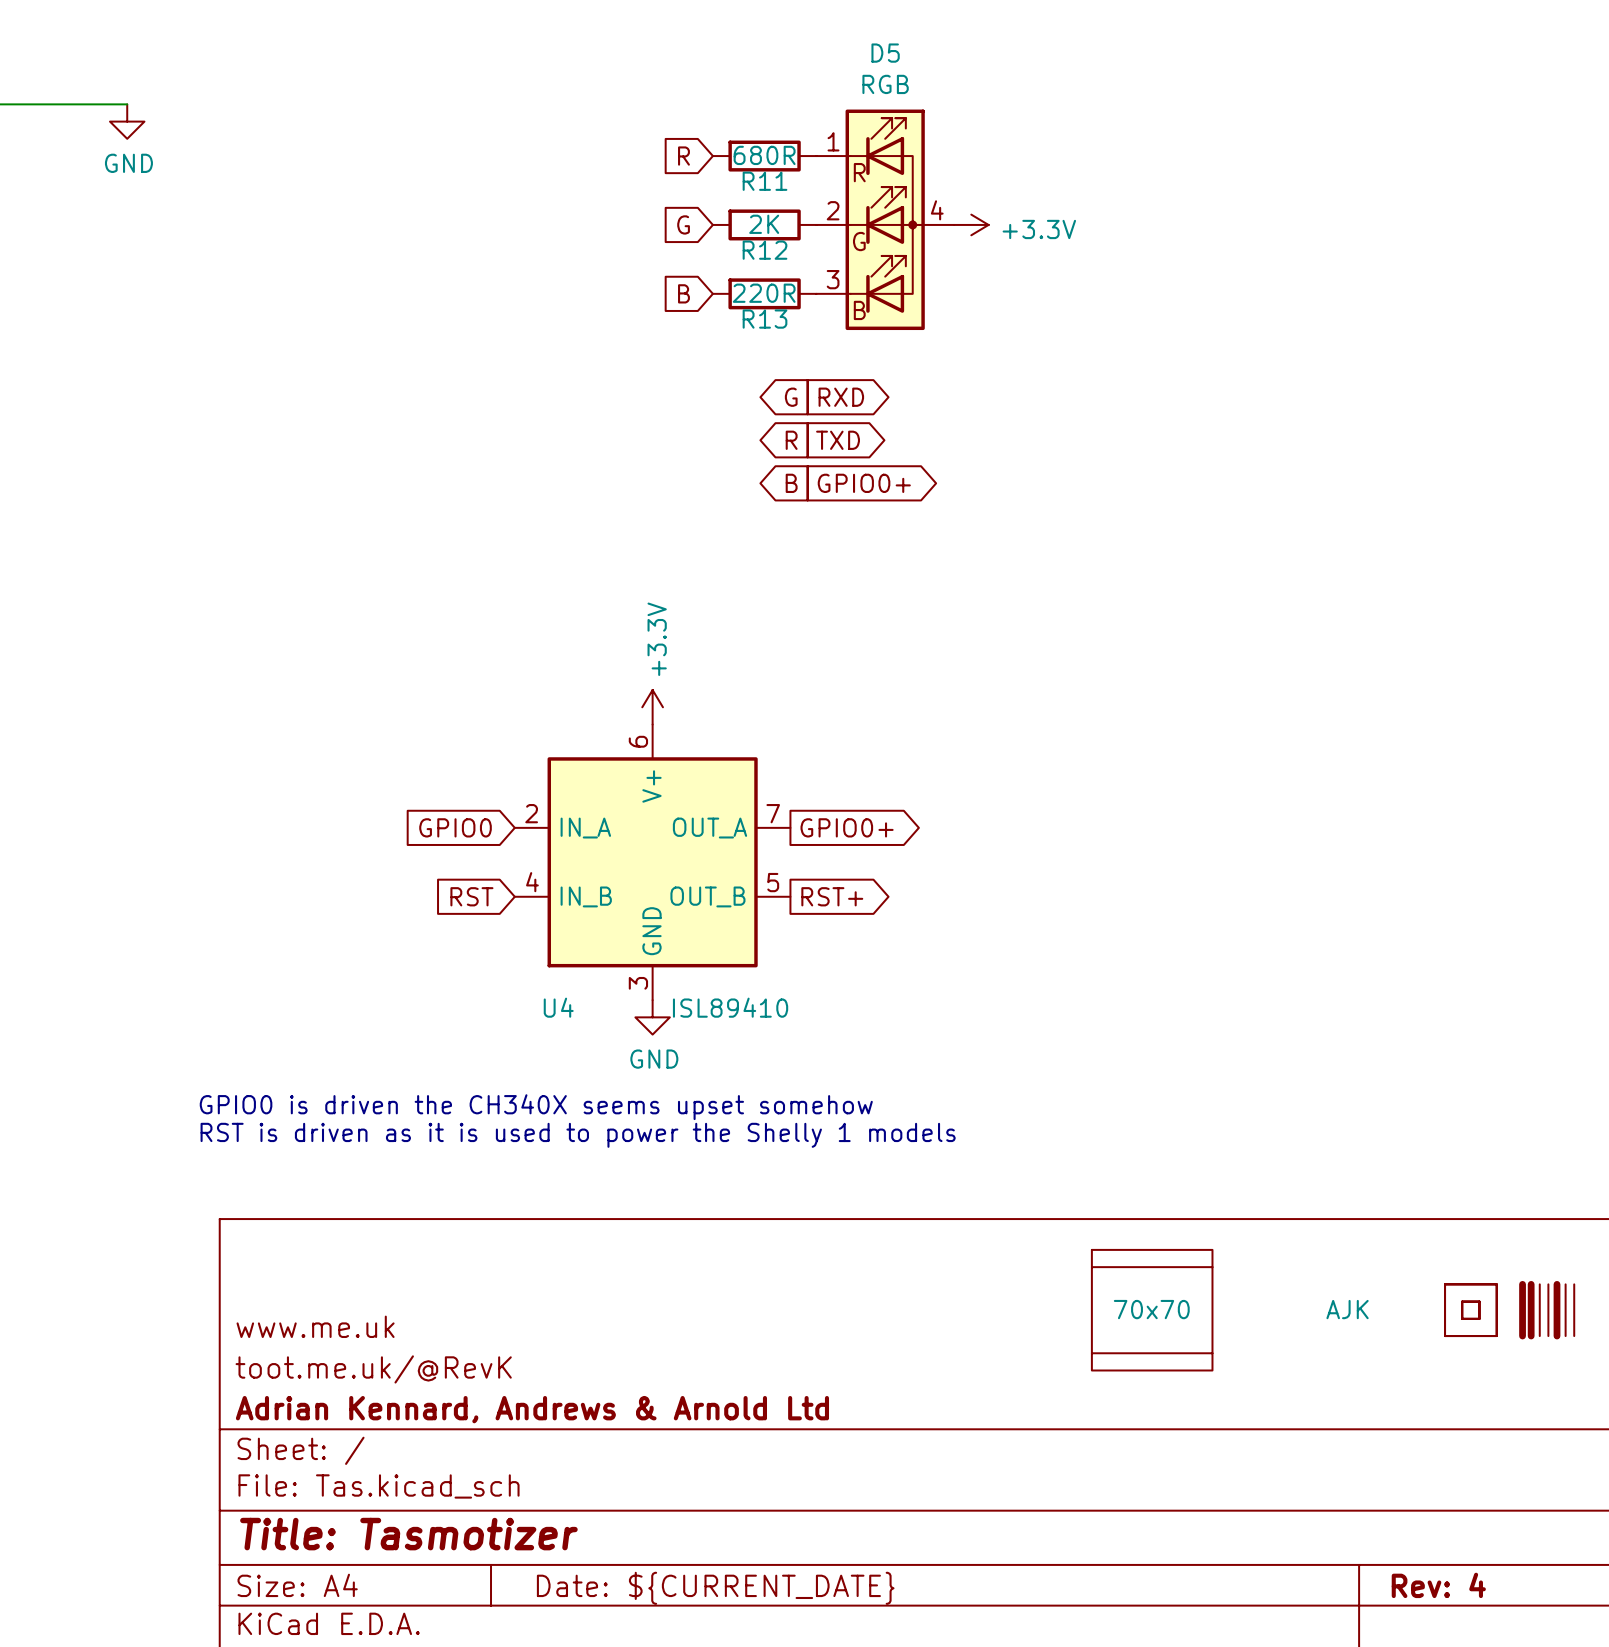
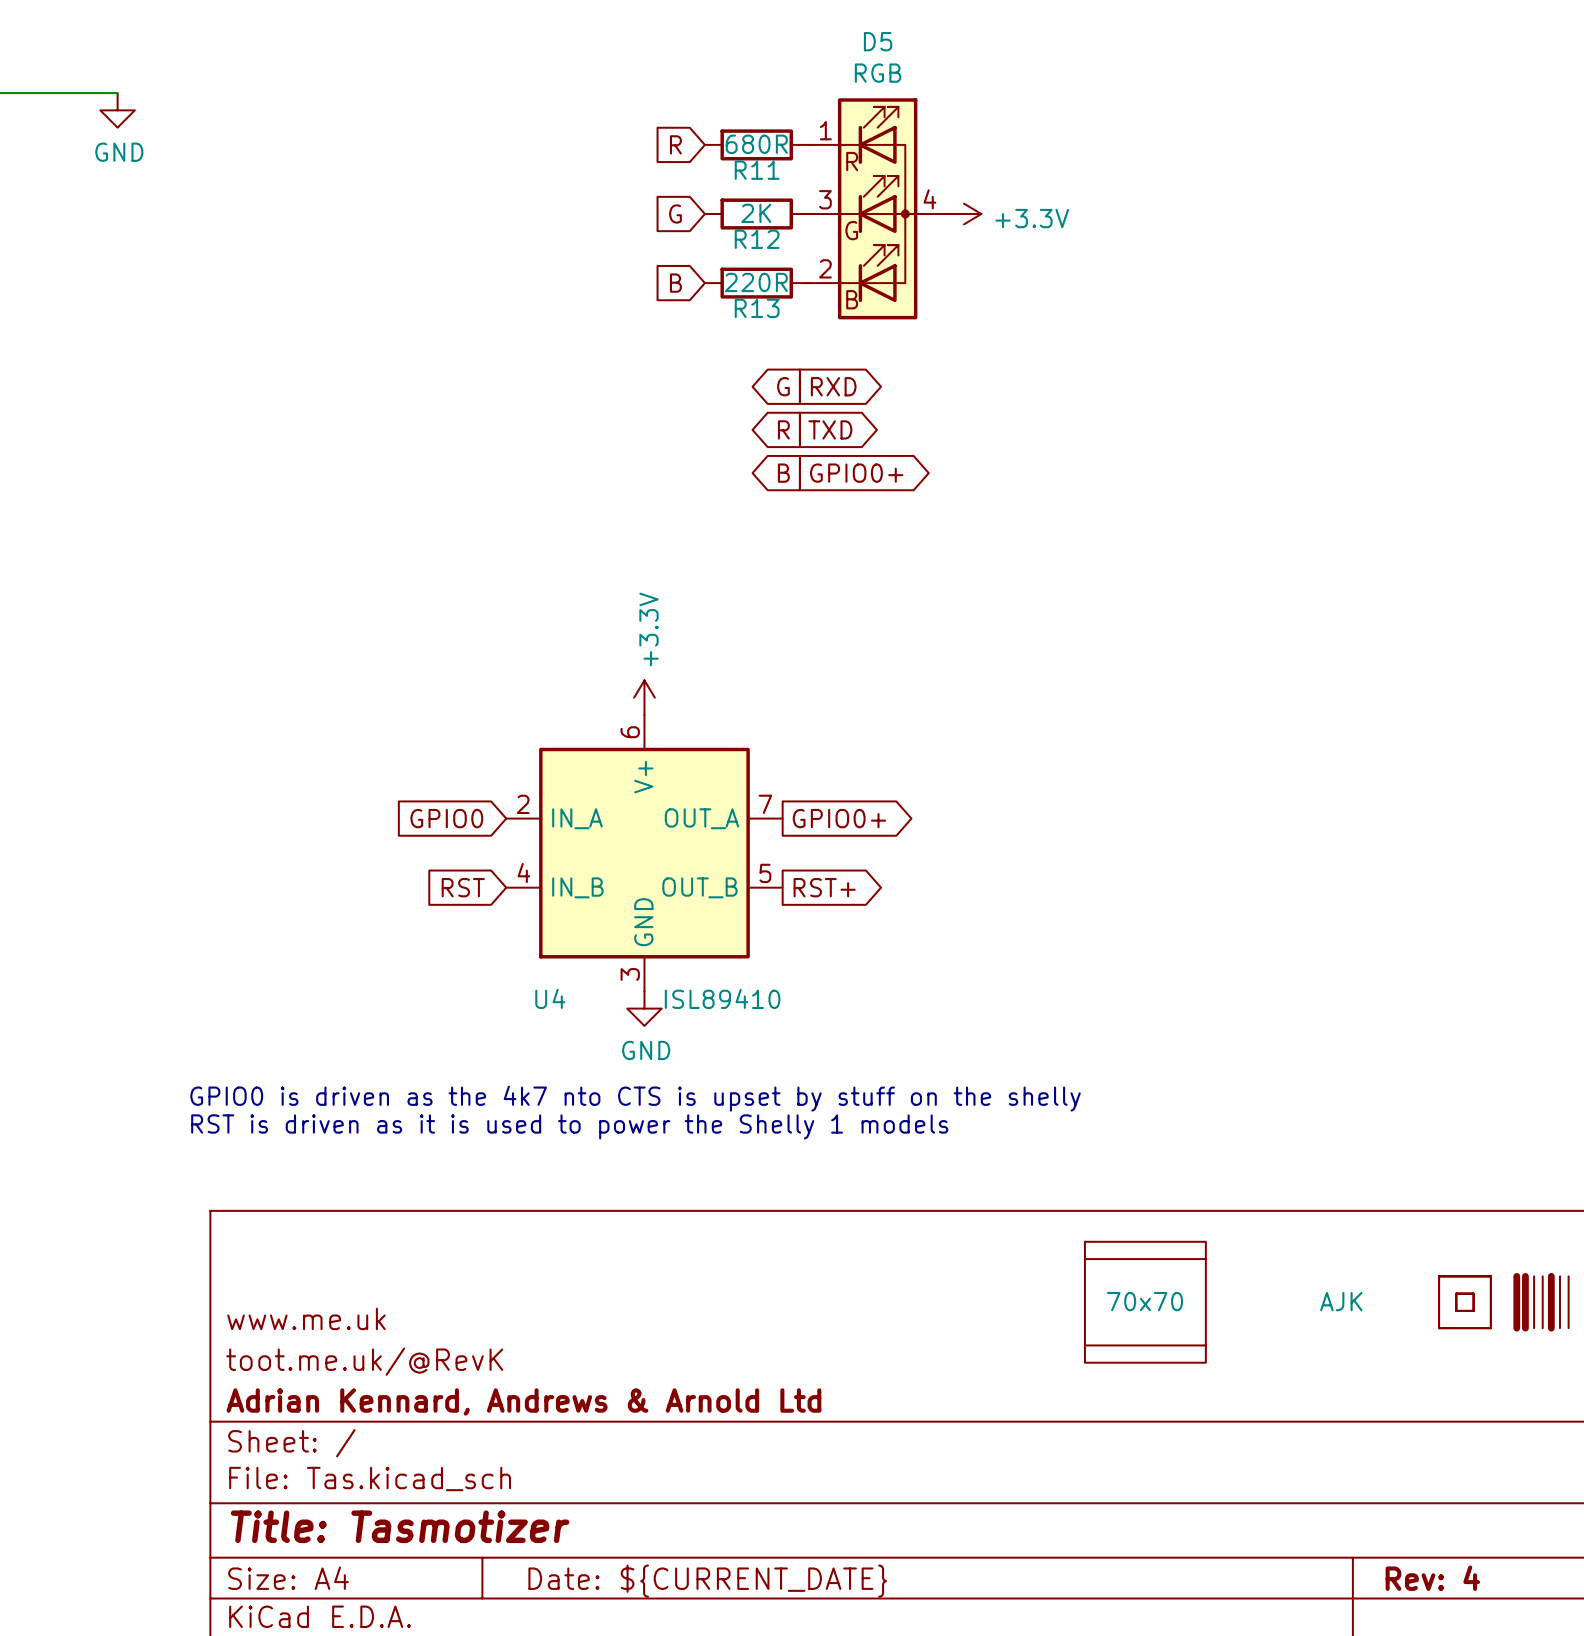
D5 pin number: 2 (833, 210) -> 3 (825, 199)
D5 pin number: 3 (833, 279) -> 2 (825, 268)
text: GPIO0 is driven the CH340X seems upset somehow (536, 1107) -> GPIO0 is driven as the 4k7 nto CTS is upset by stuff on the shelly (635, 1098)

